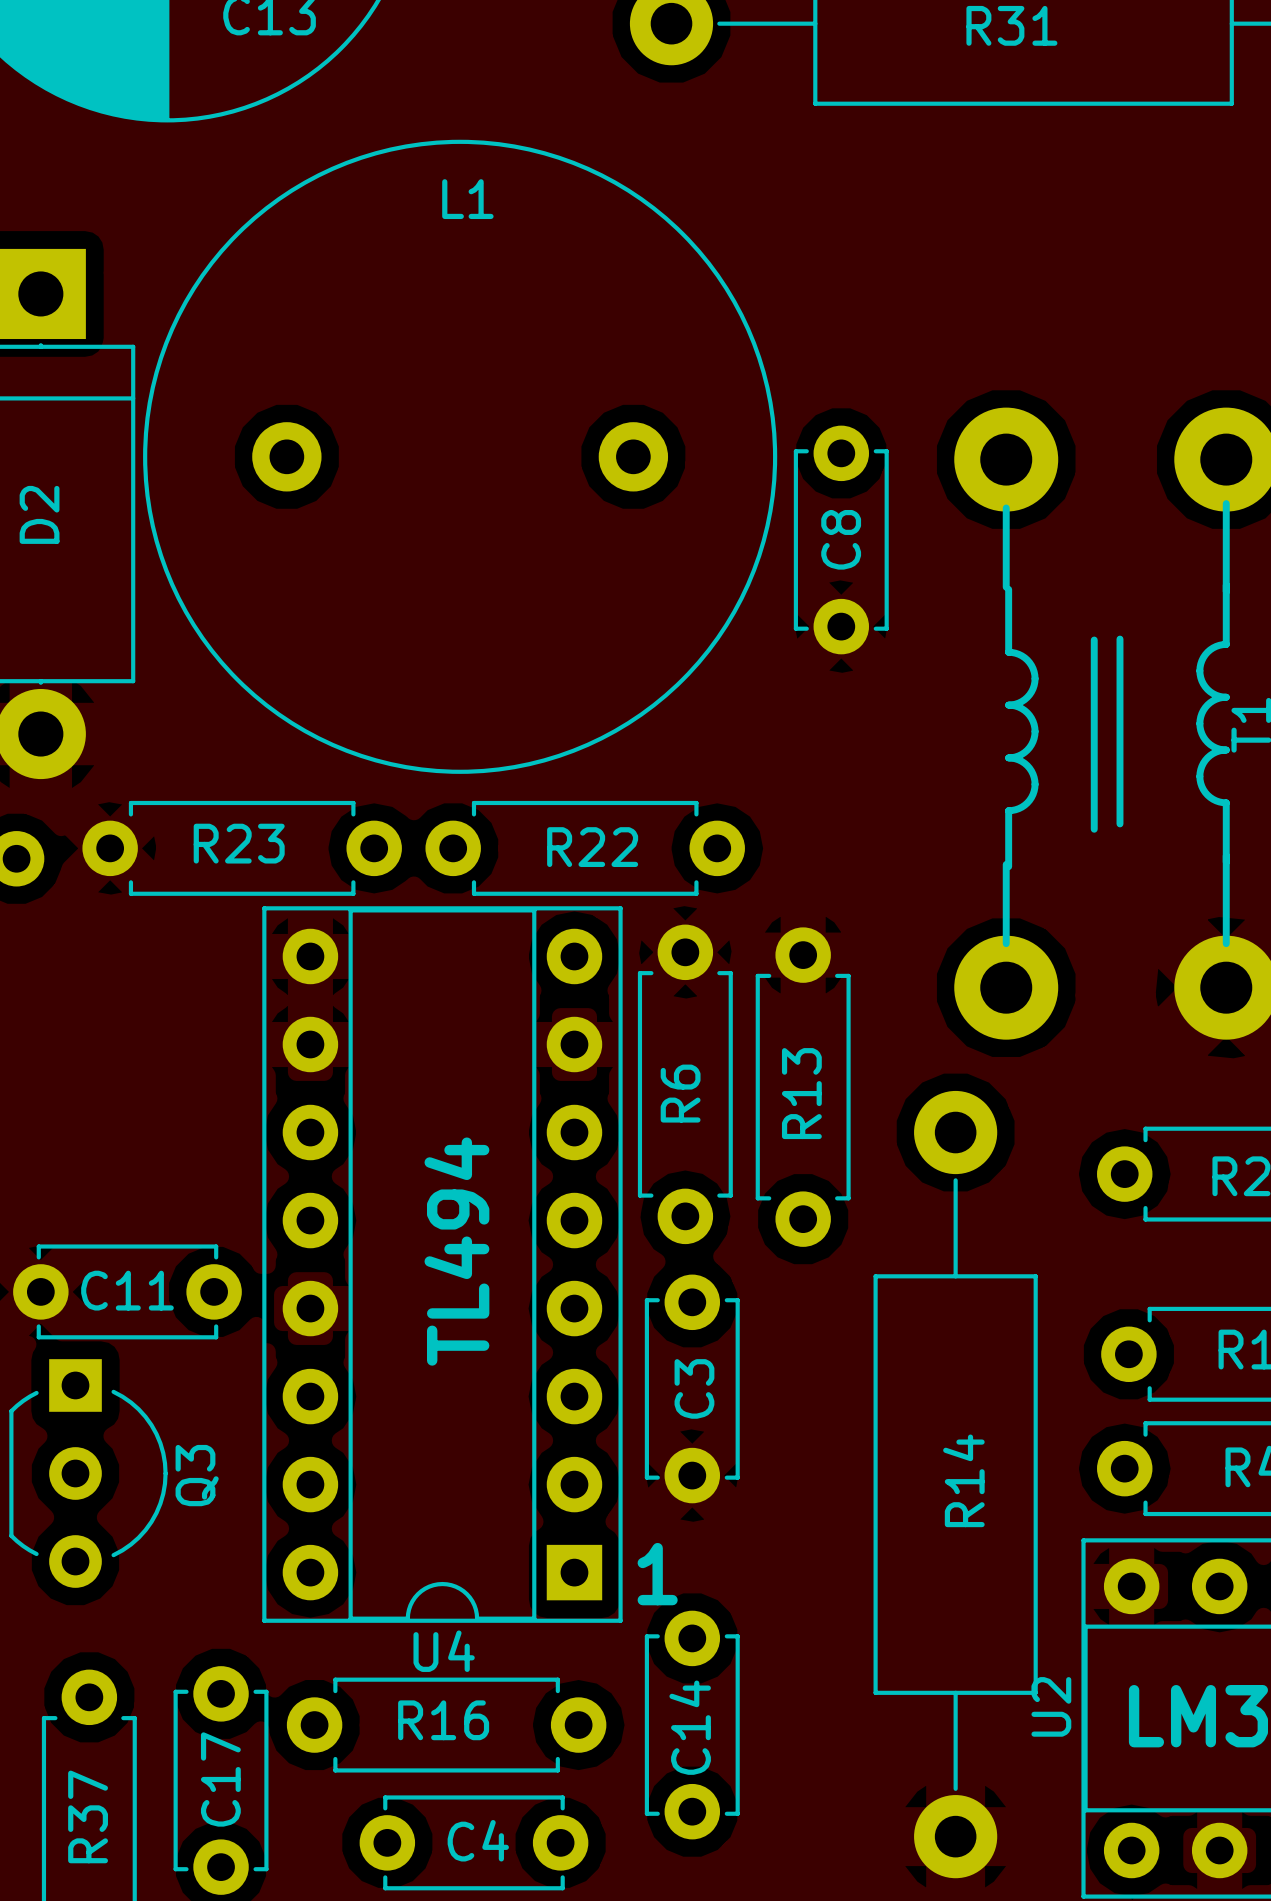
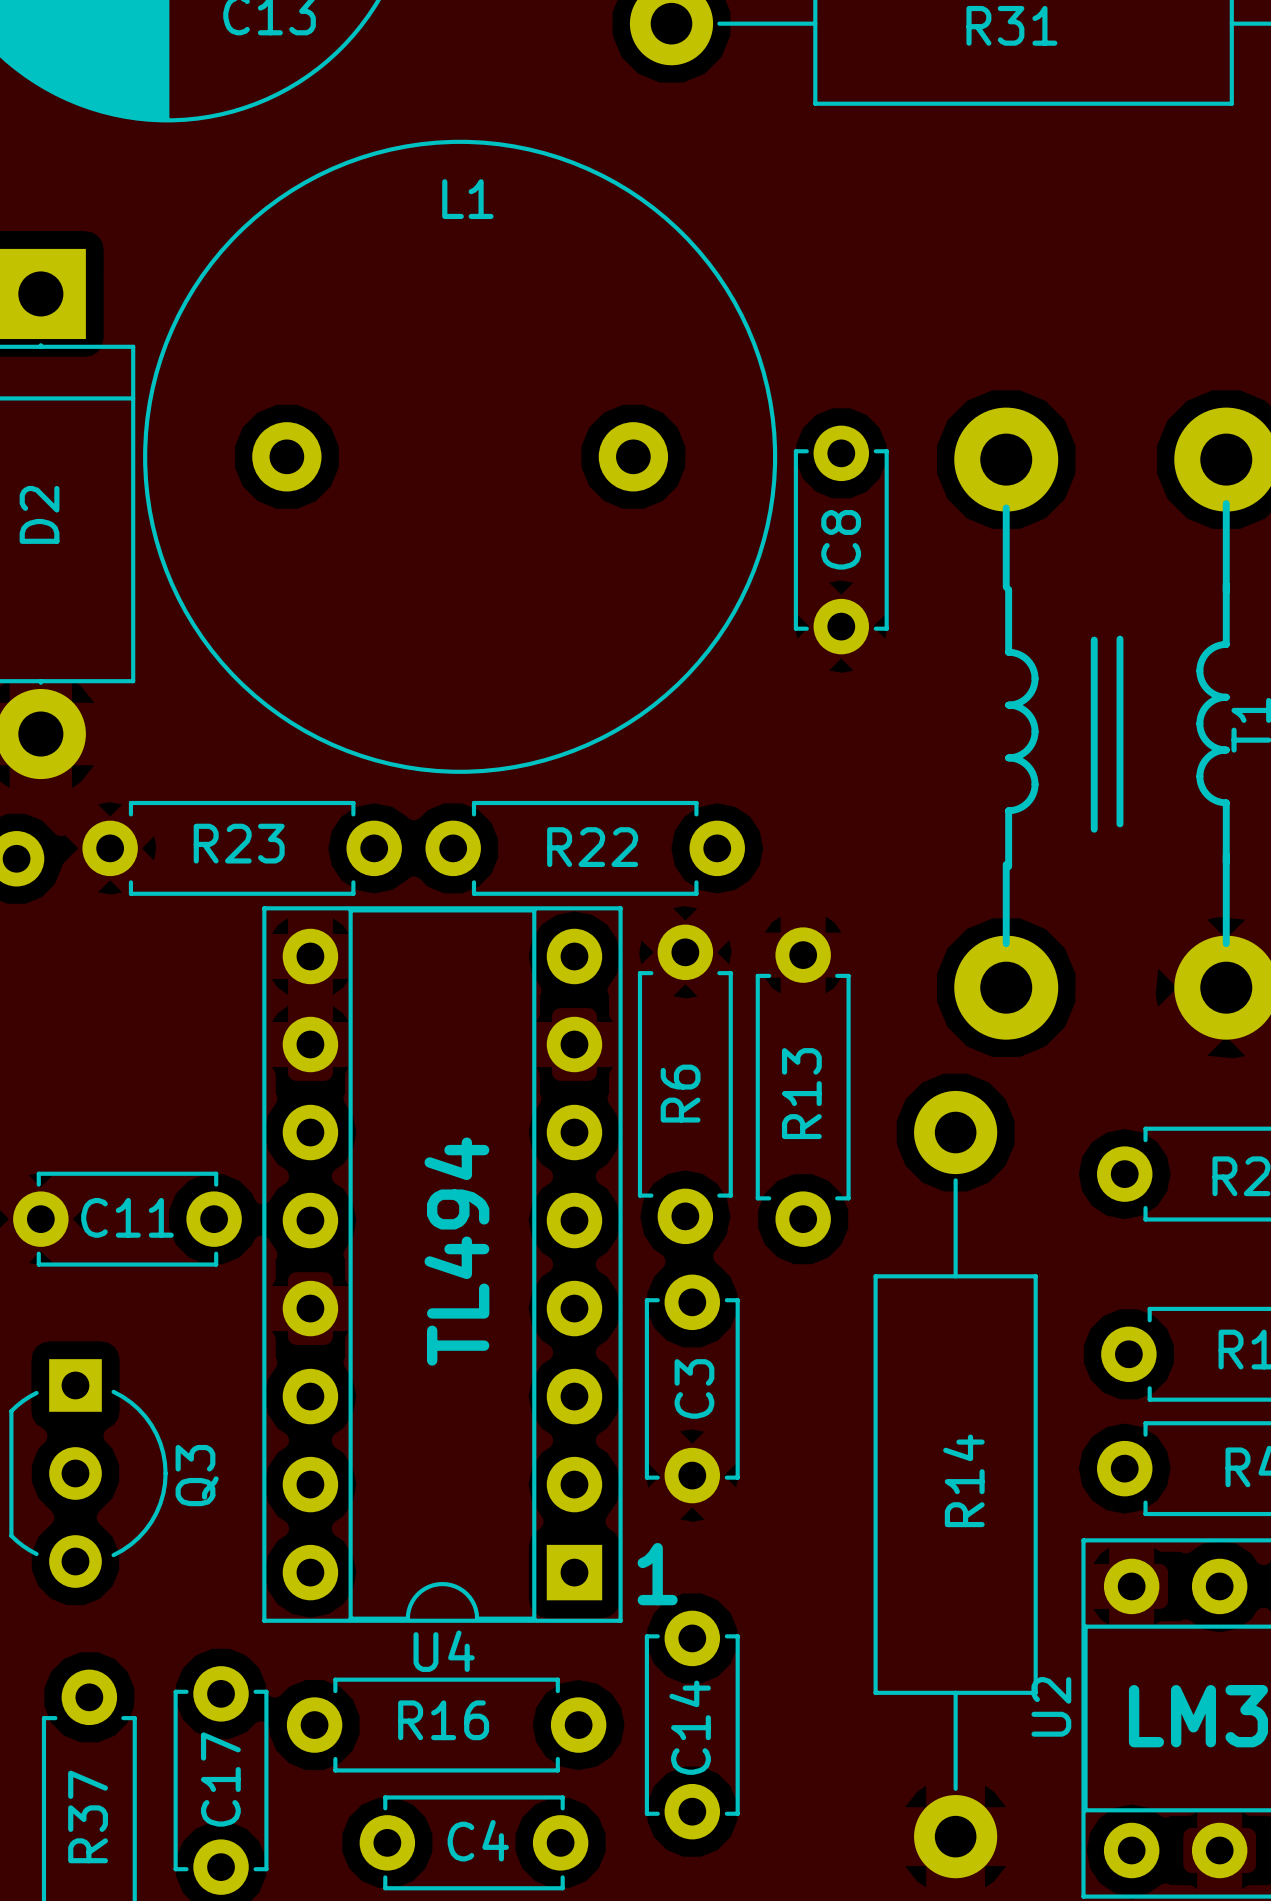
C11 position: (127, 1291) -> (127, 1219)

